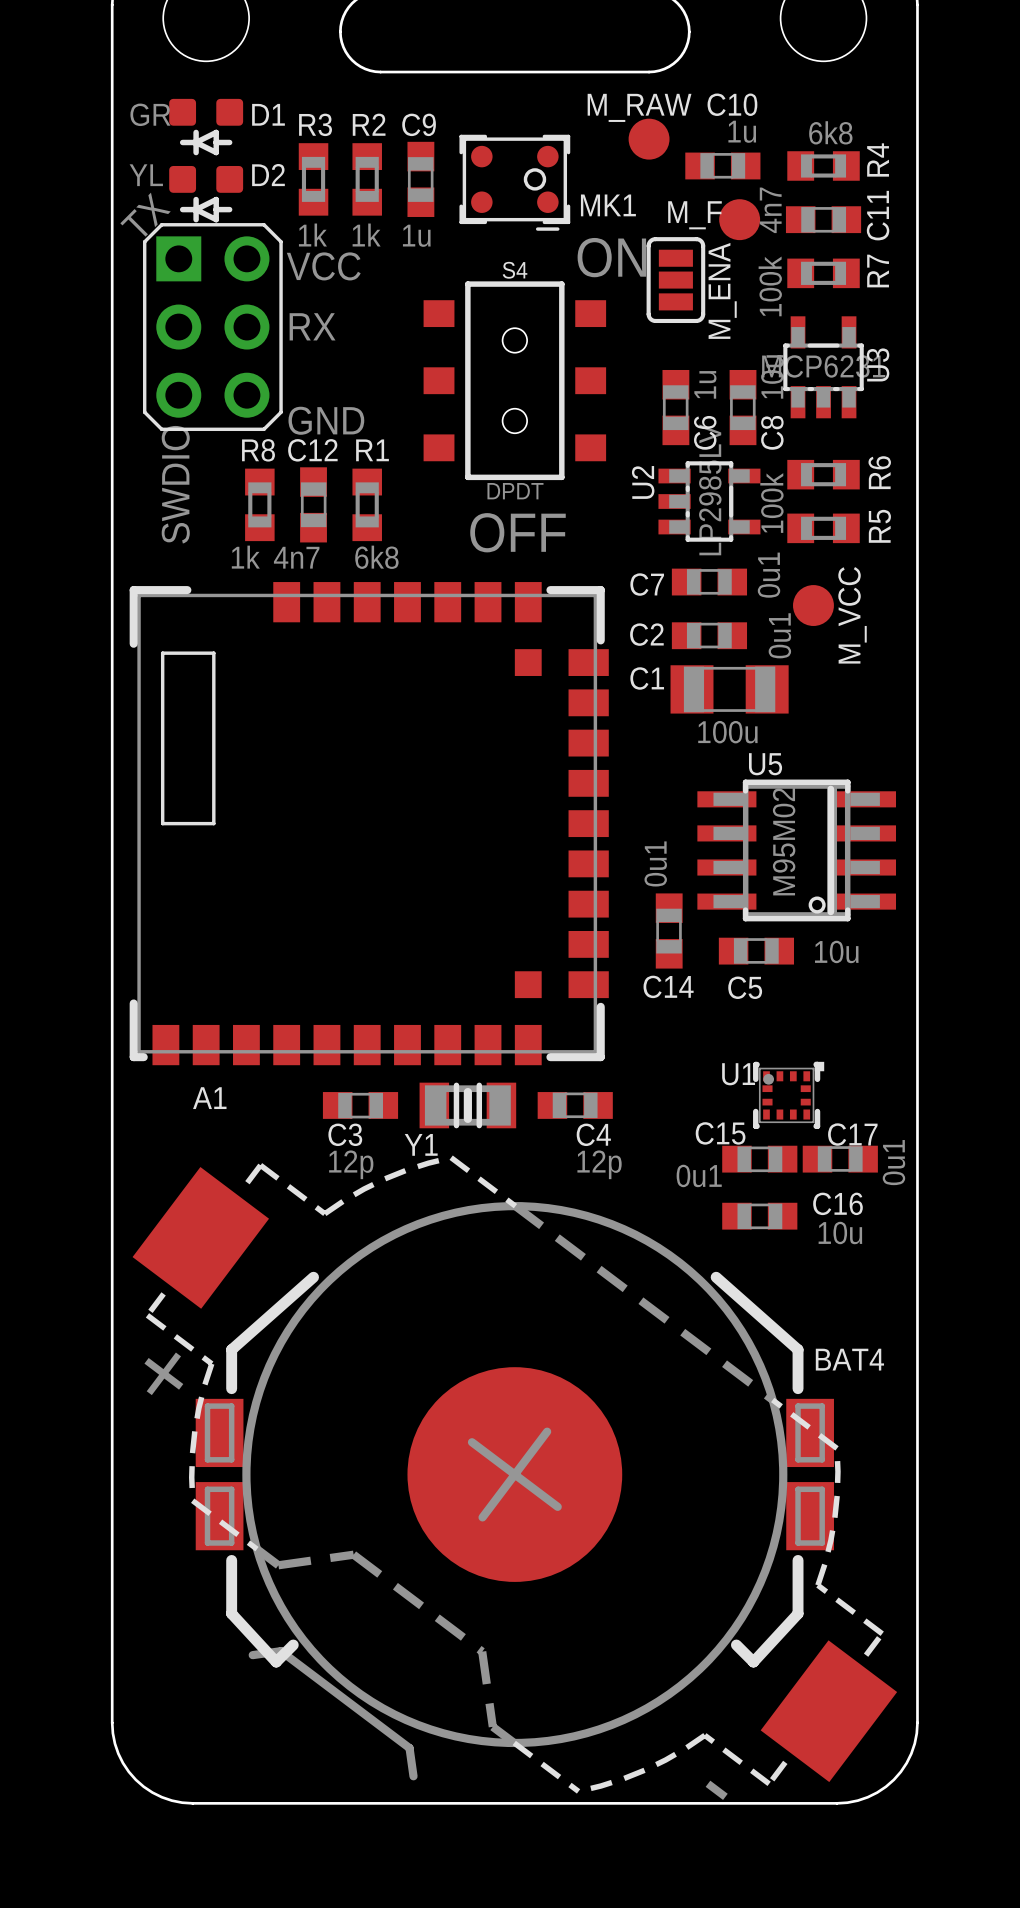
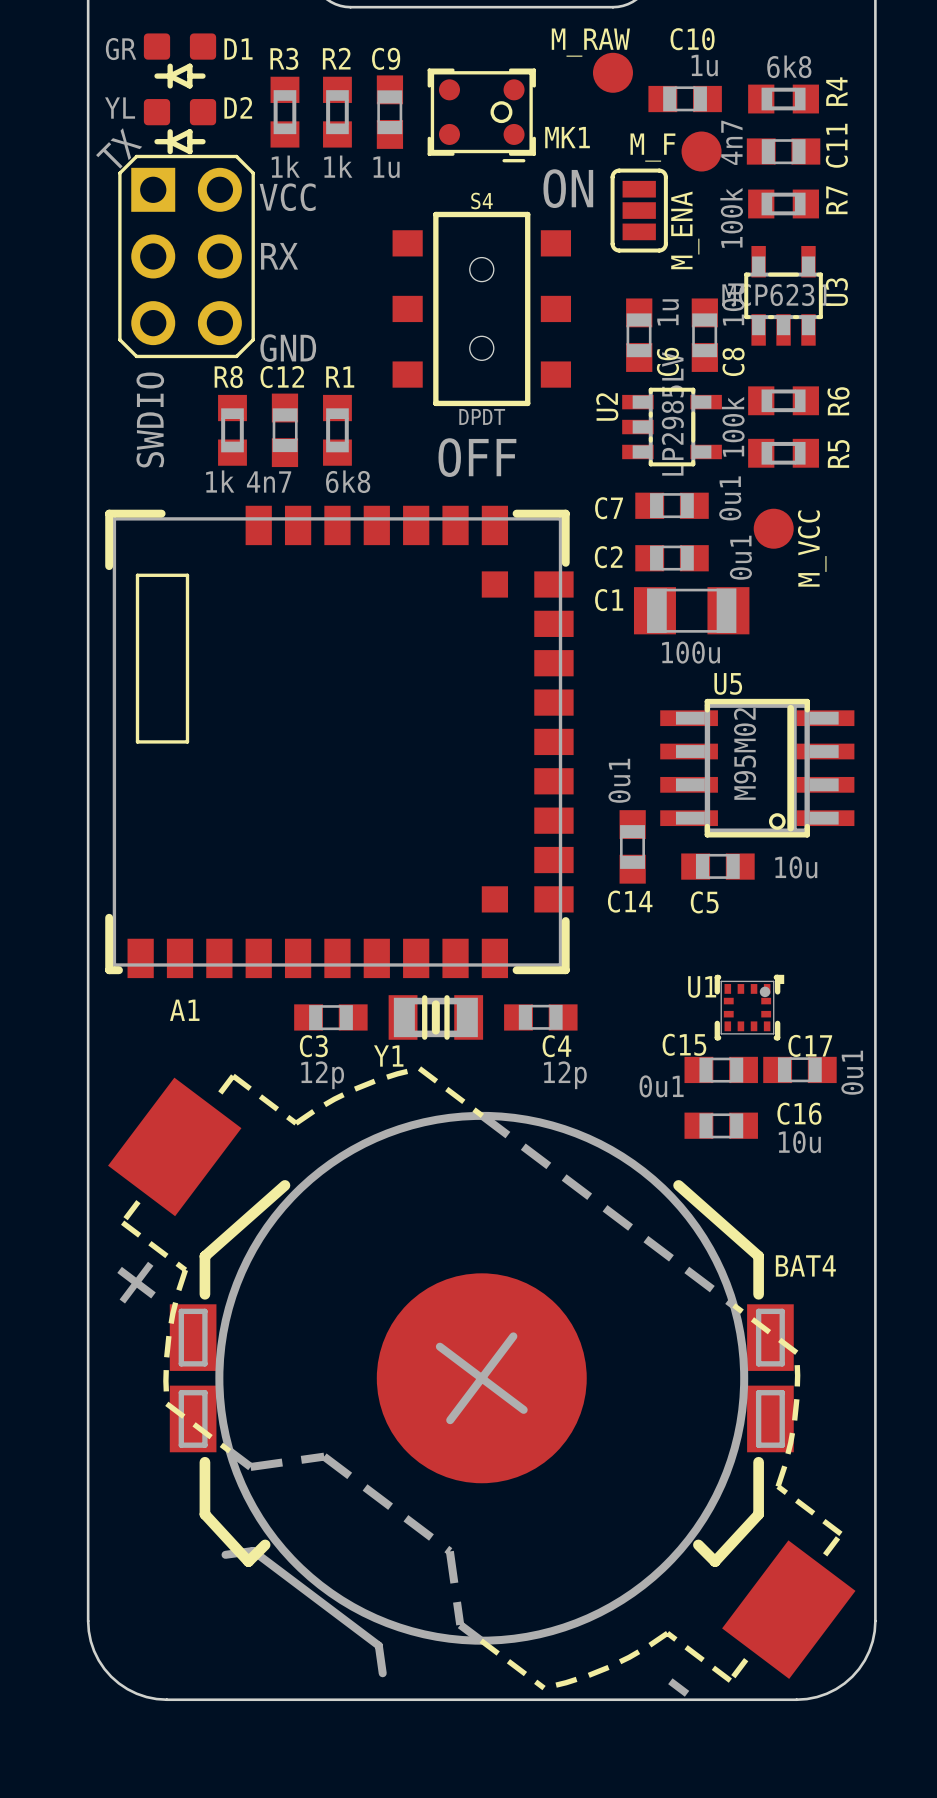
U1 footprint: [753, 1061, 825, 1129] -> [714, 974, 785, 1041]

